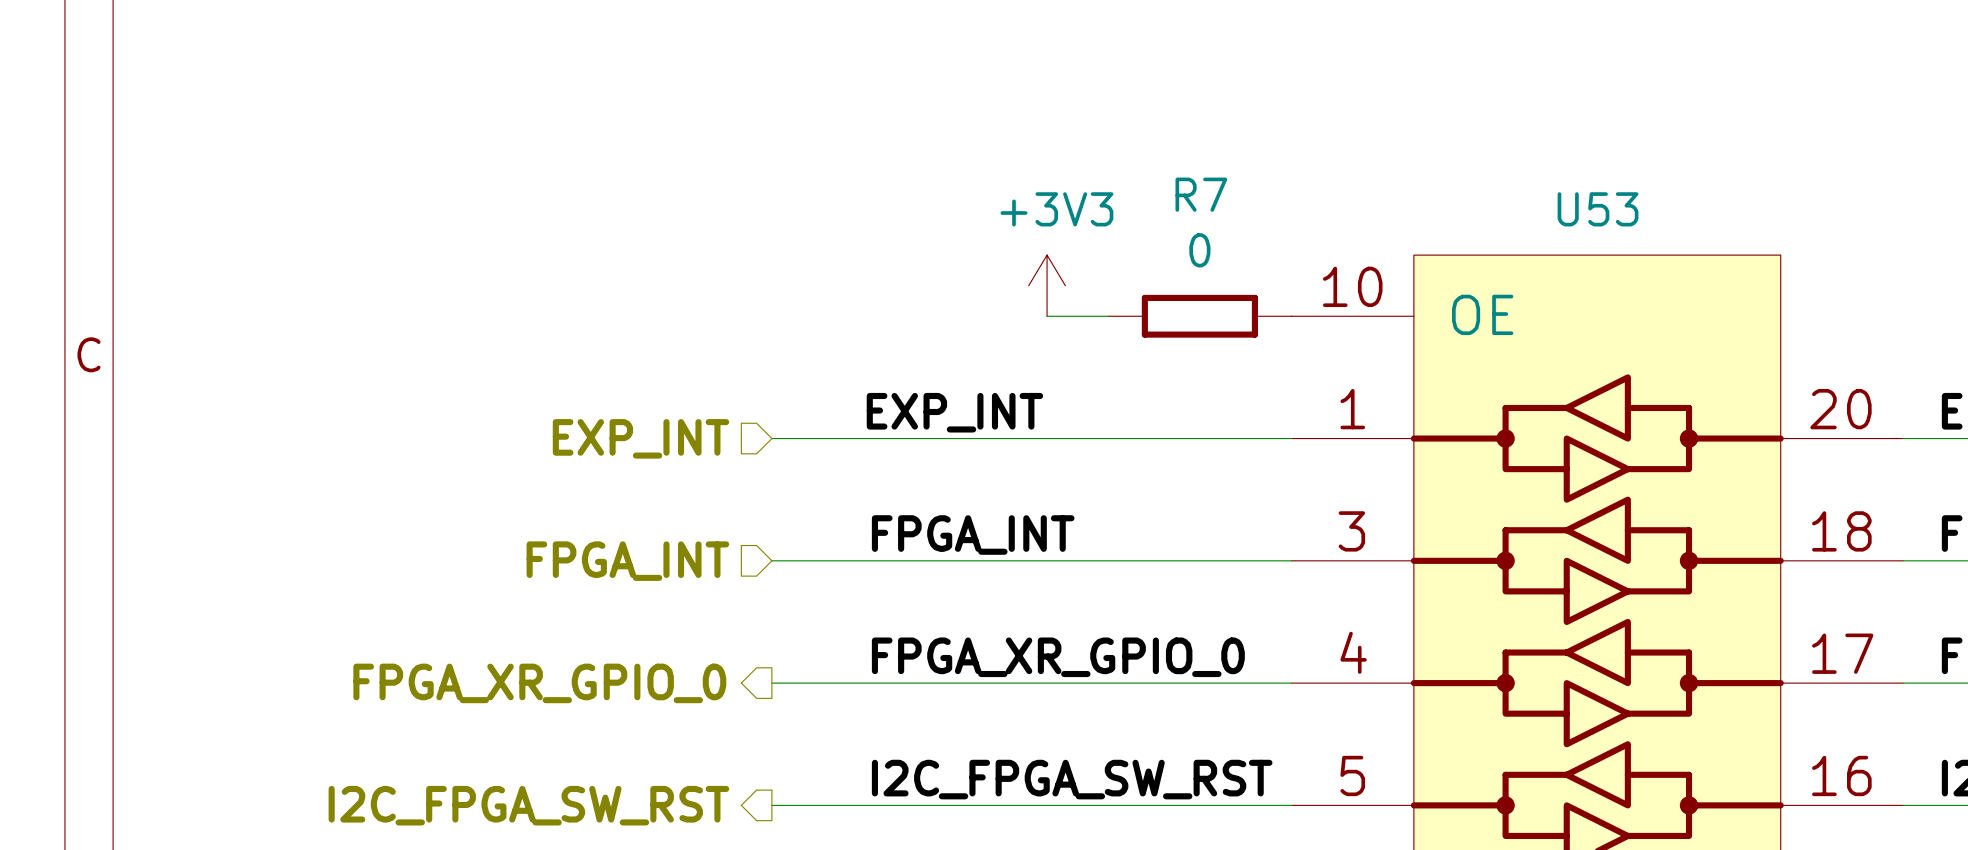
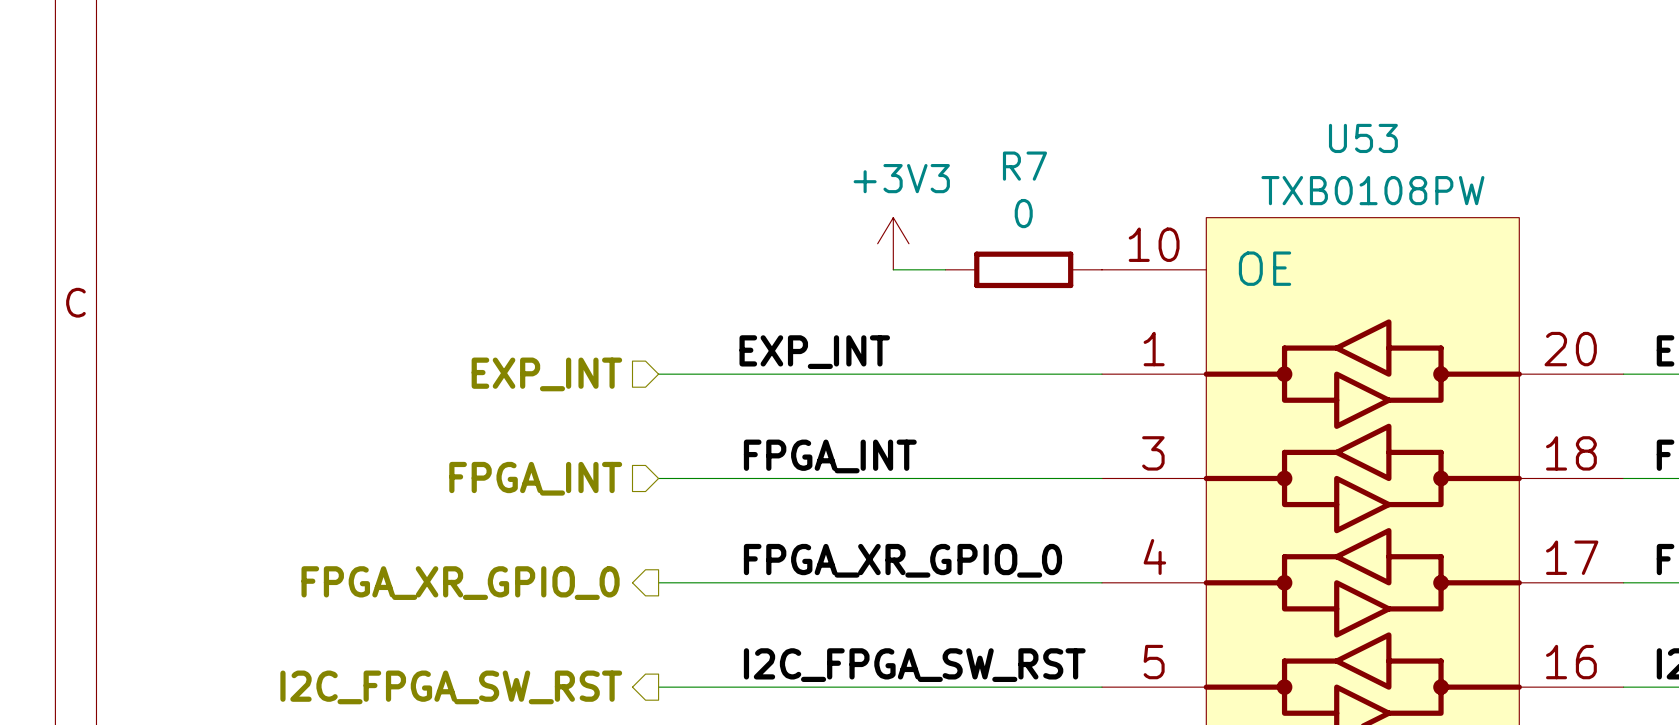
U53 name position: U53 (1598, 209) -> U53 (1363, 138)
U53 value: none -> TXB0108PW (1372, 190)

